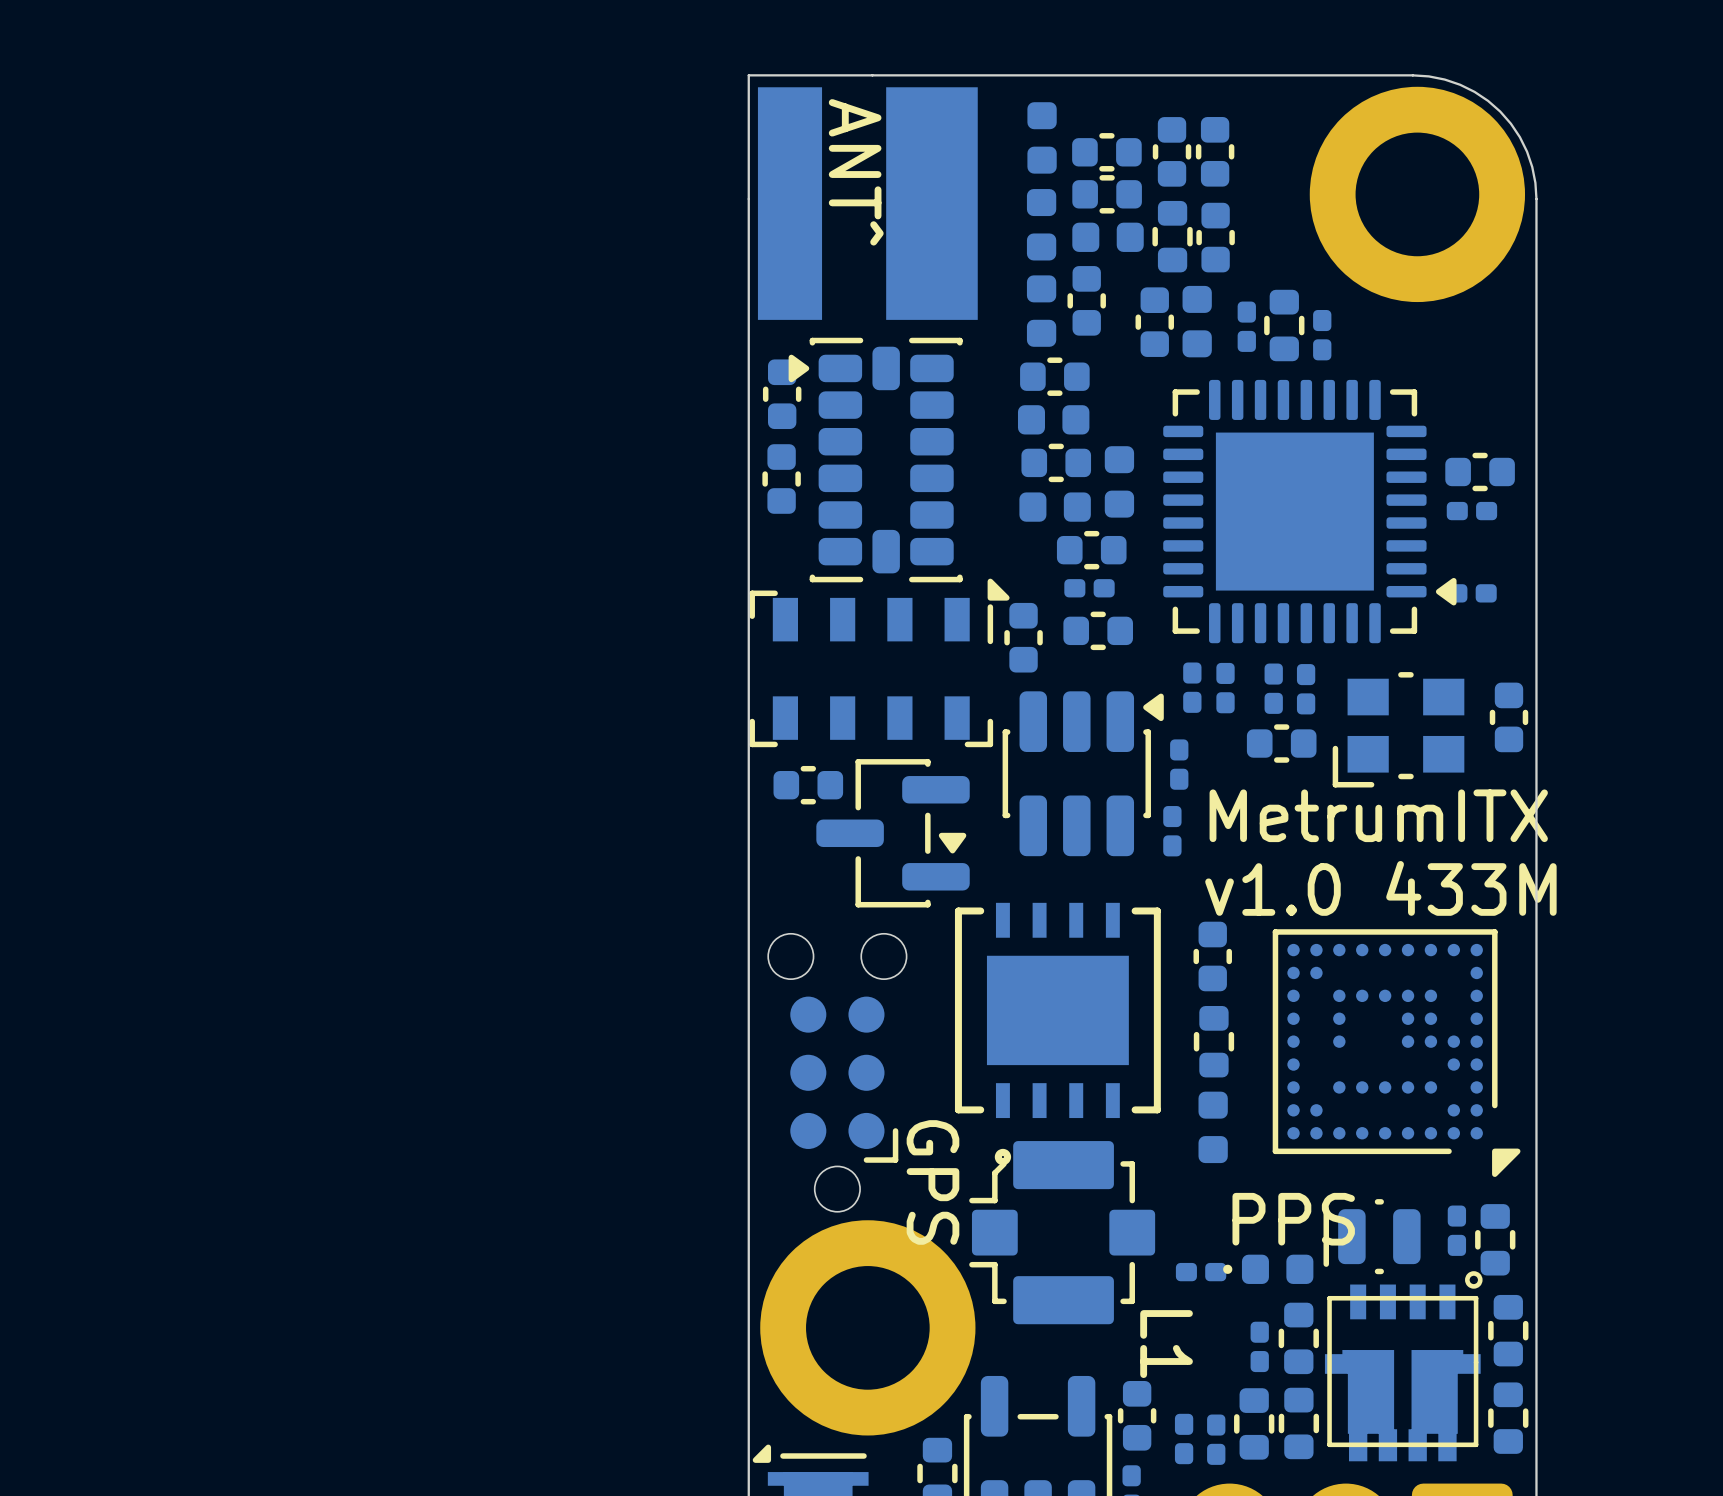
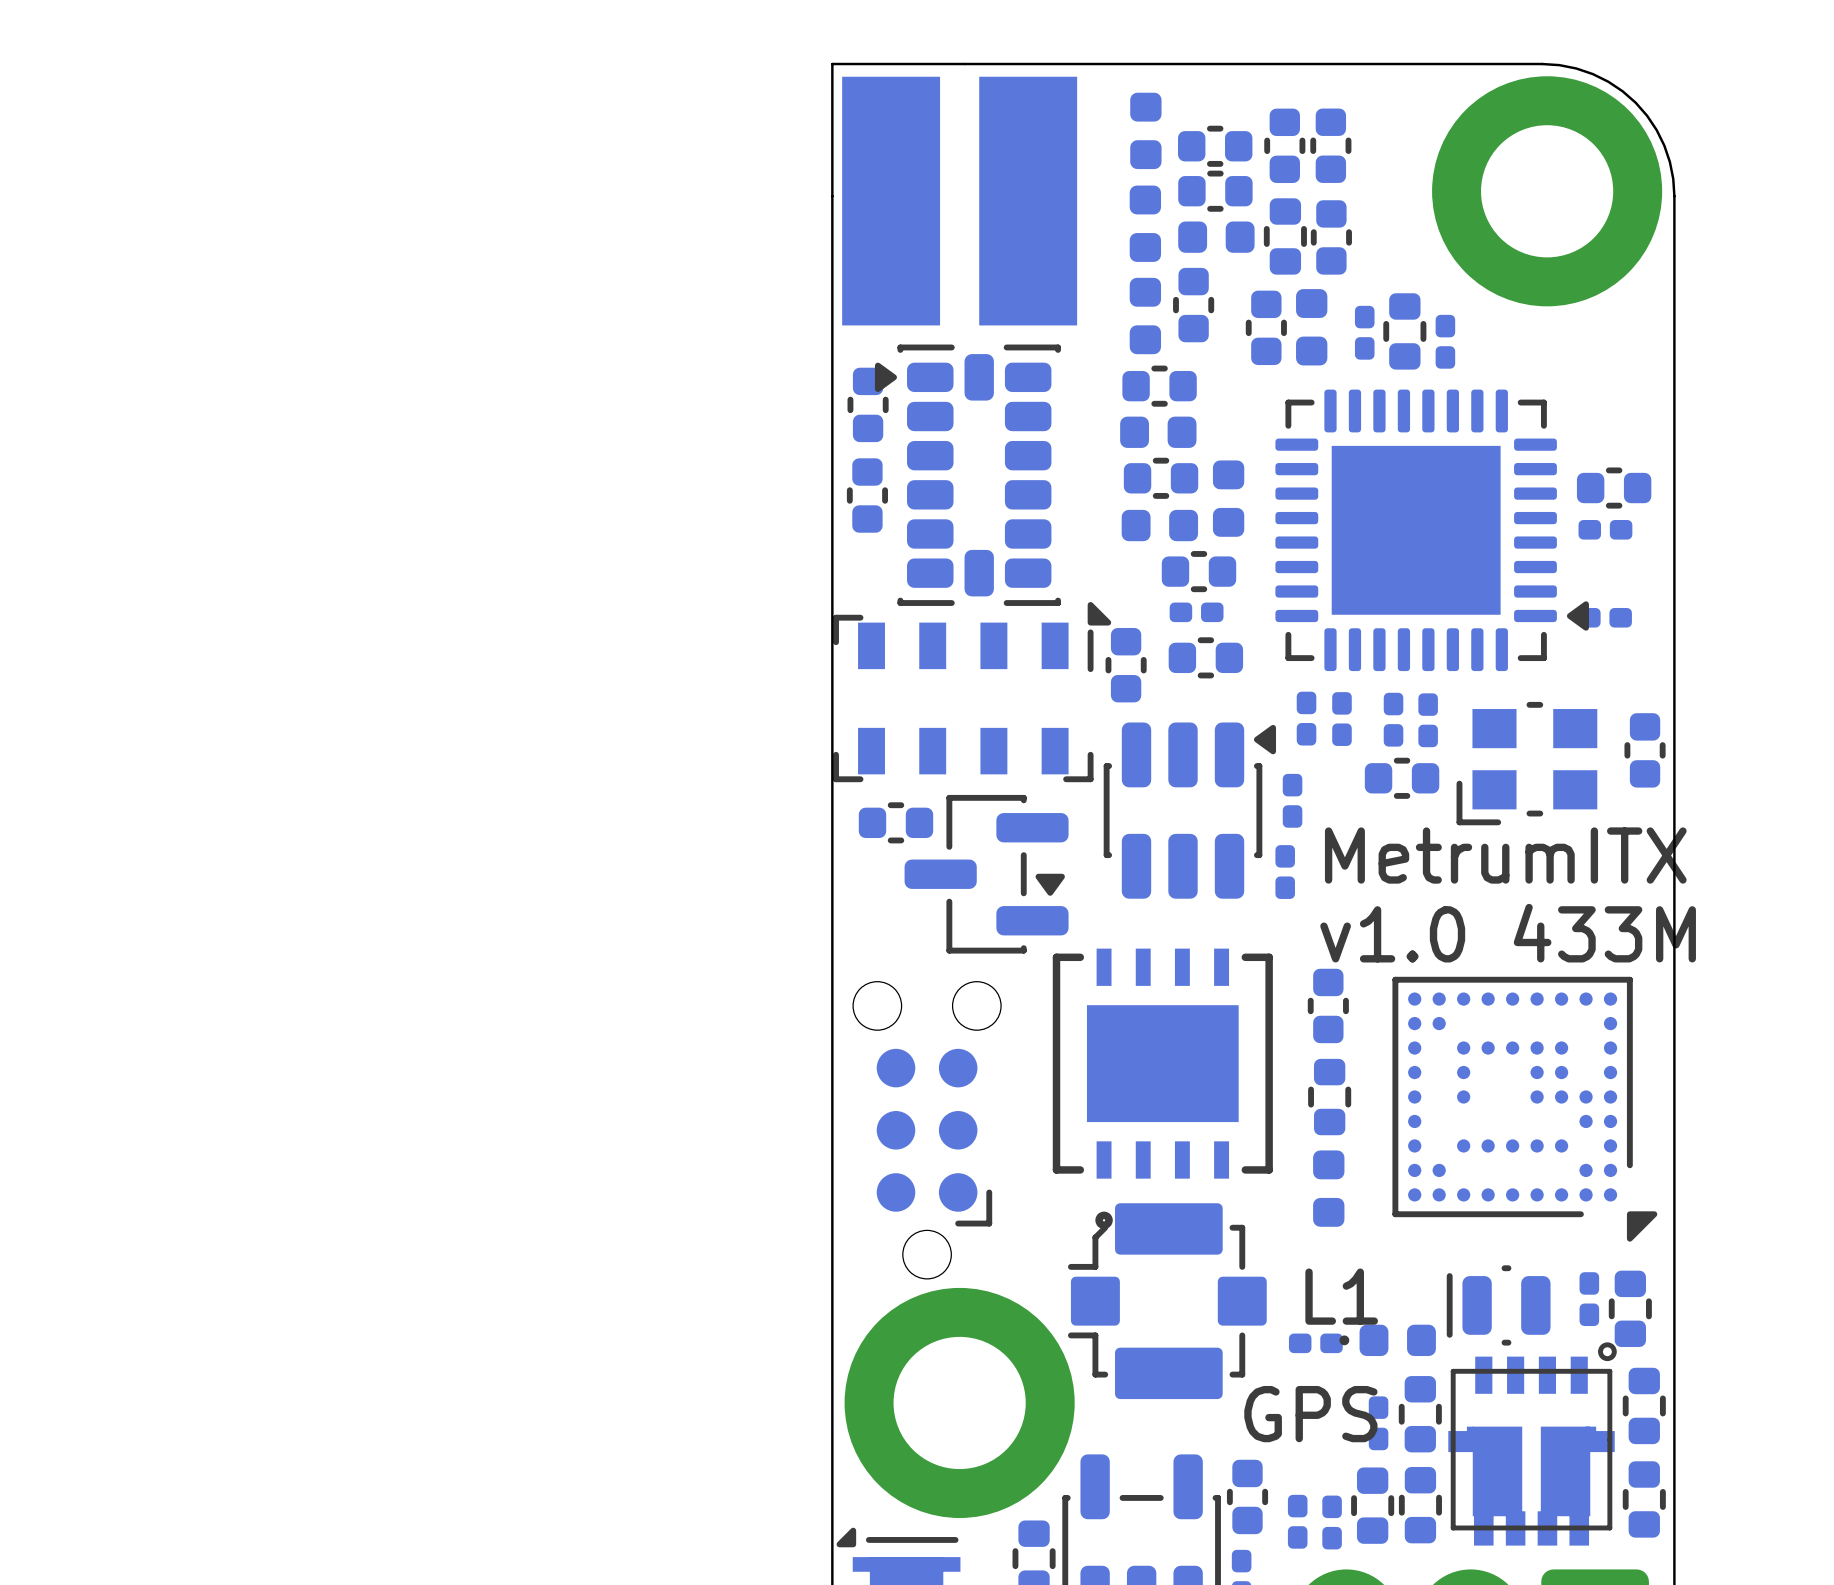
part footprint: [757, 87, 823, 320] -> [842, 76, 941, 326]
text: ANT^ (856, 172) -> none
text rotation: 0° (932, 1182) -> 90° counterclockwise (1310, 1414)
text position: GPS (932, 1182) -> GPS (1310, 1414)
text: PPS (1293, 1219) -> none
text rotation: 0° (1166, 1344) -> 90° counterclockwise (1341, 1296)
text position: L1 (1166, 1344) -> L1 (1341, 1296)

